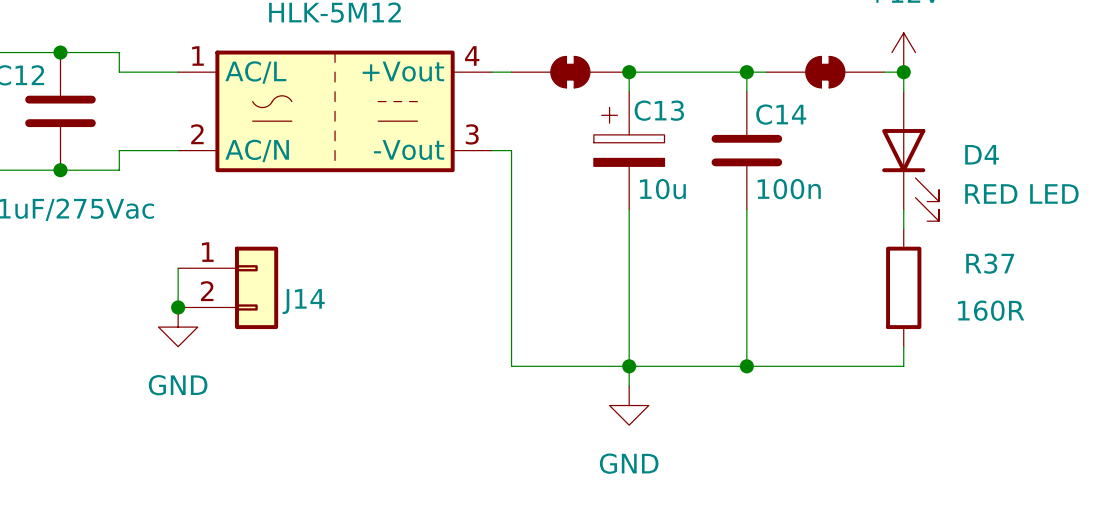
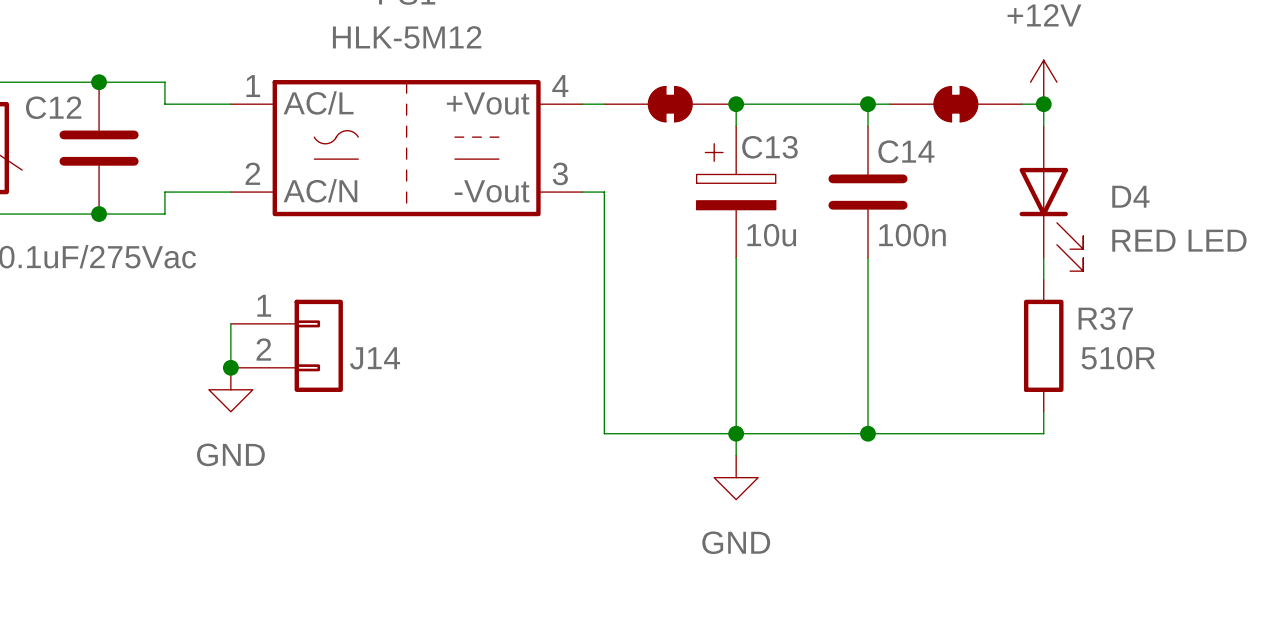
R37 name position: R37 (990, 263) -> R37 (1105, 318)
R37 value: 160R (991, 310) -> 510R (1118, 358)

